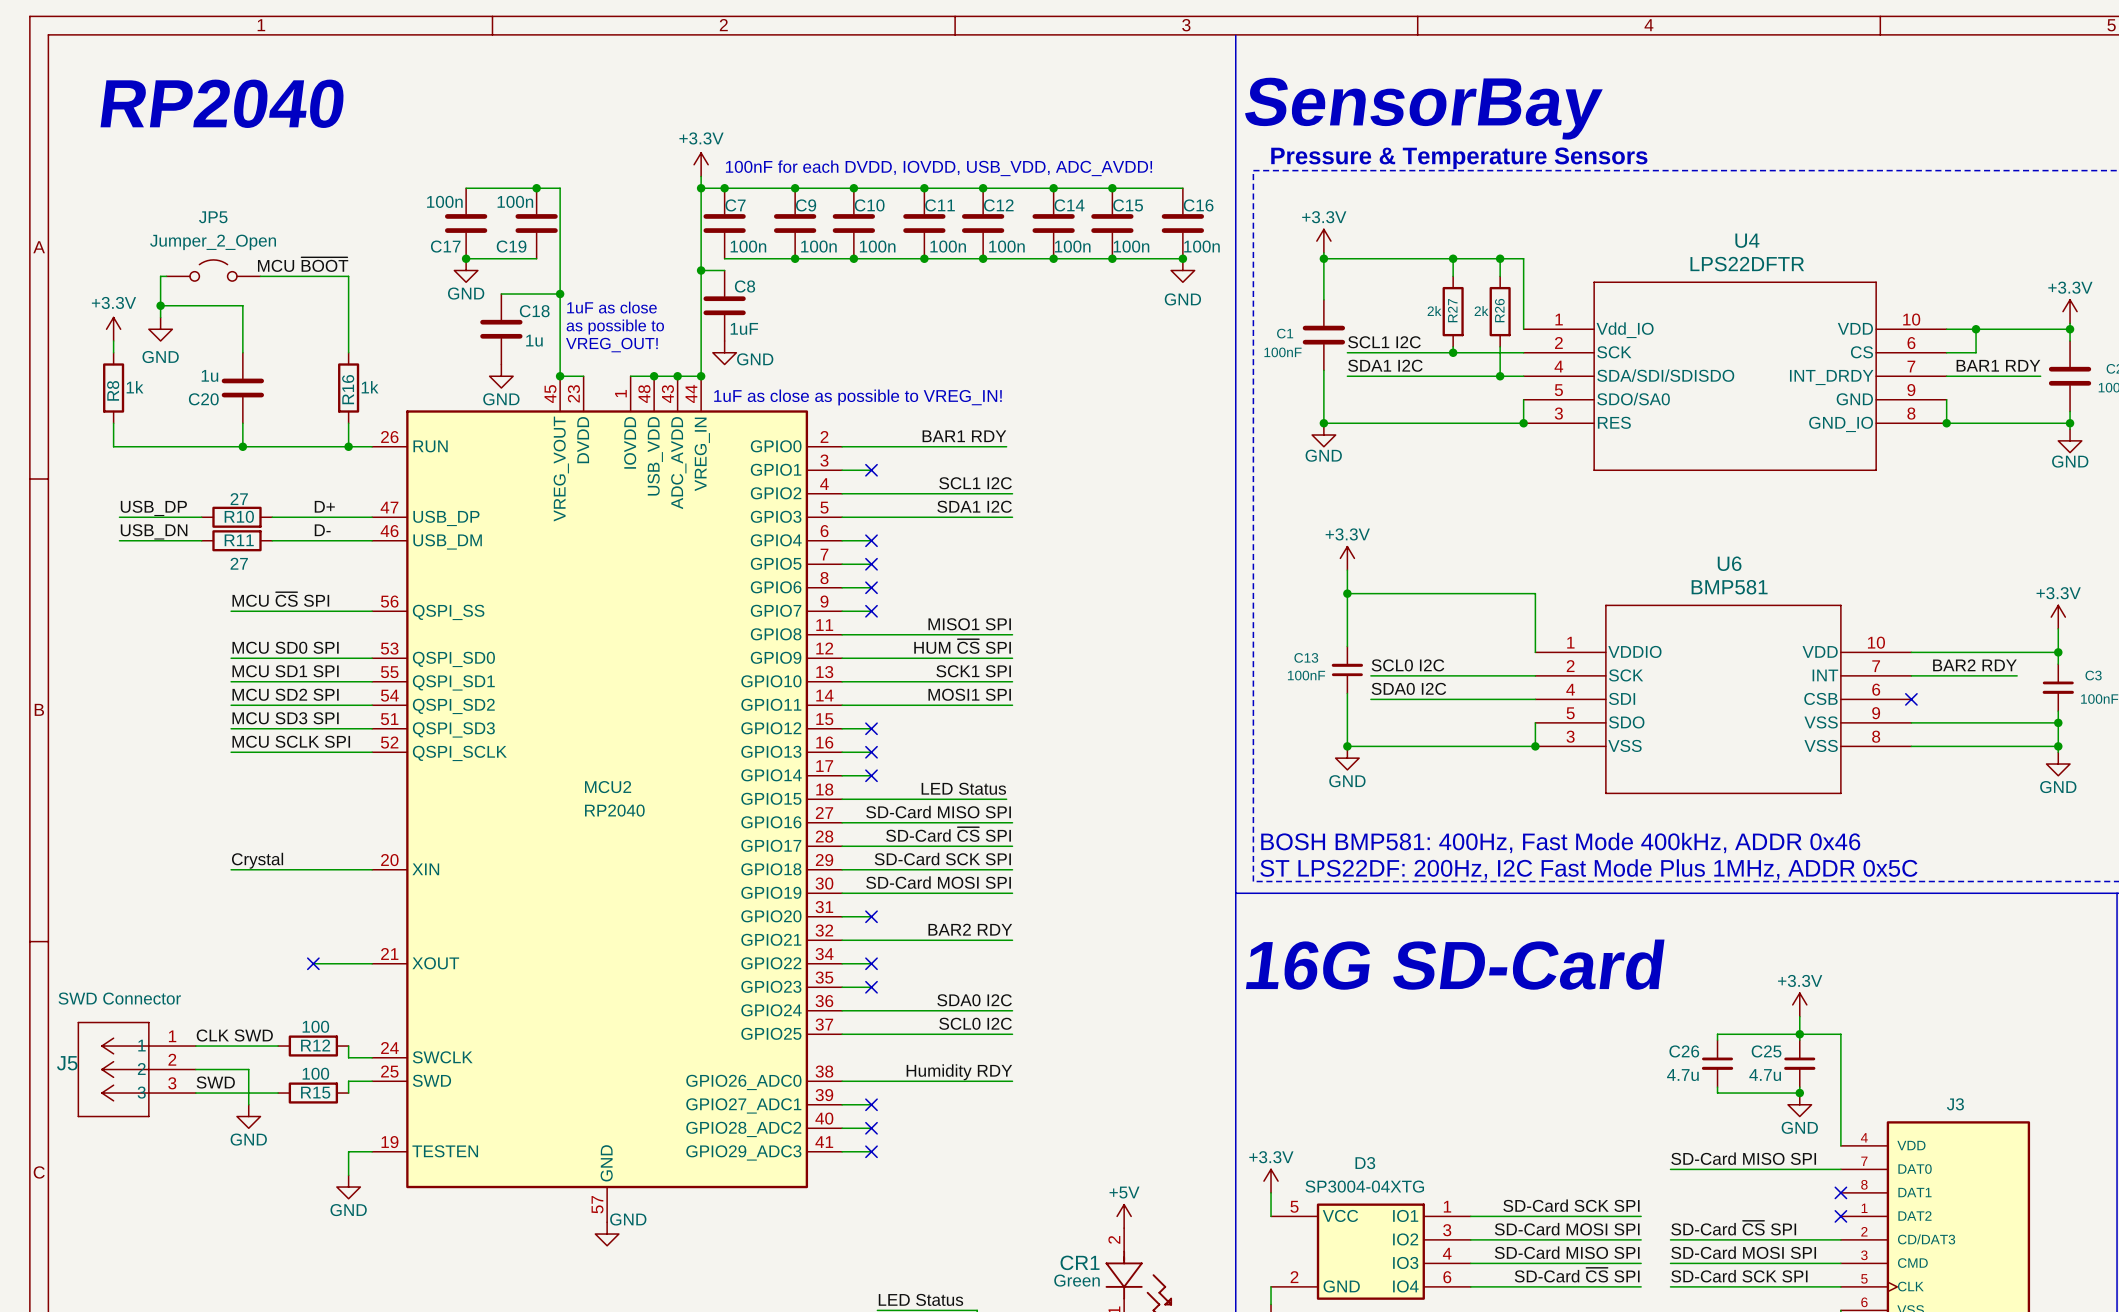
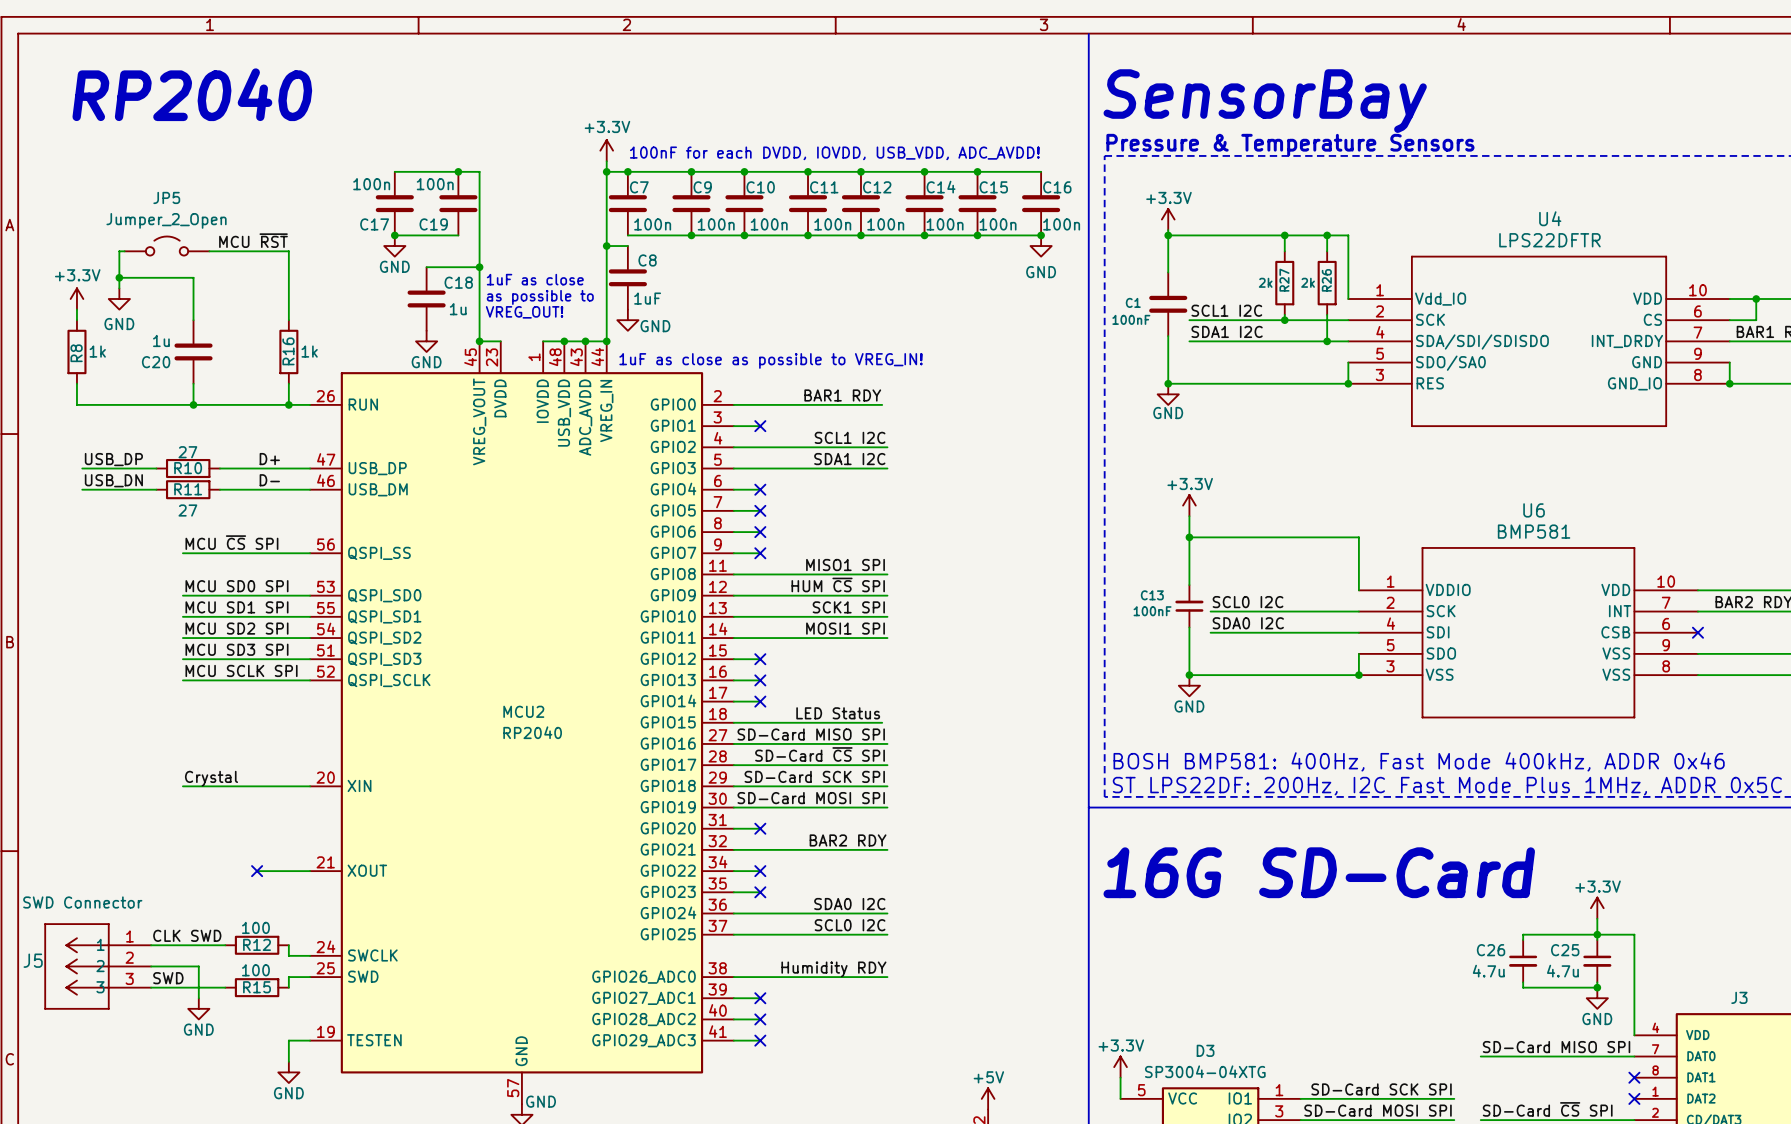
label: MCU ~{BOOT} (303, 264) -> MCU ~{RST} (253, 240)

